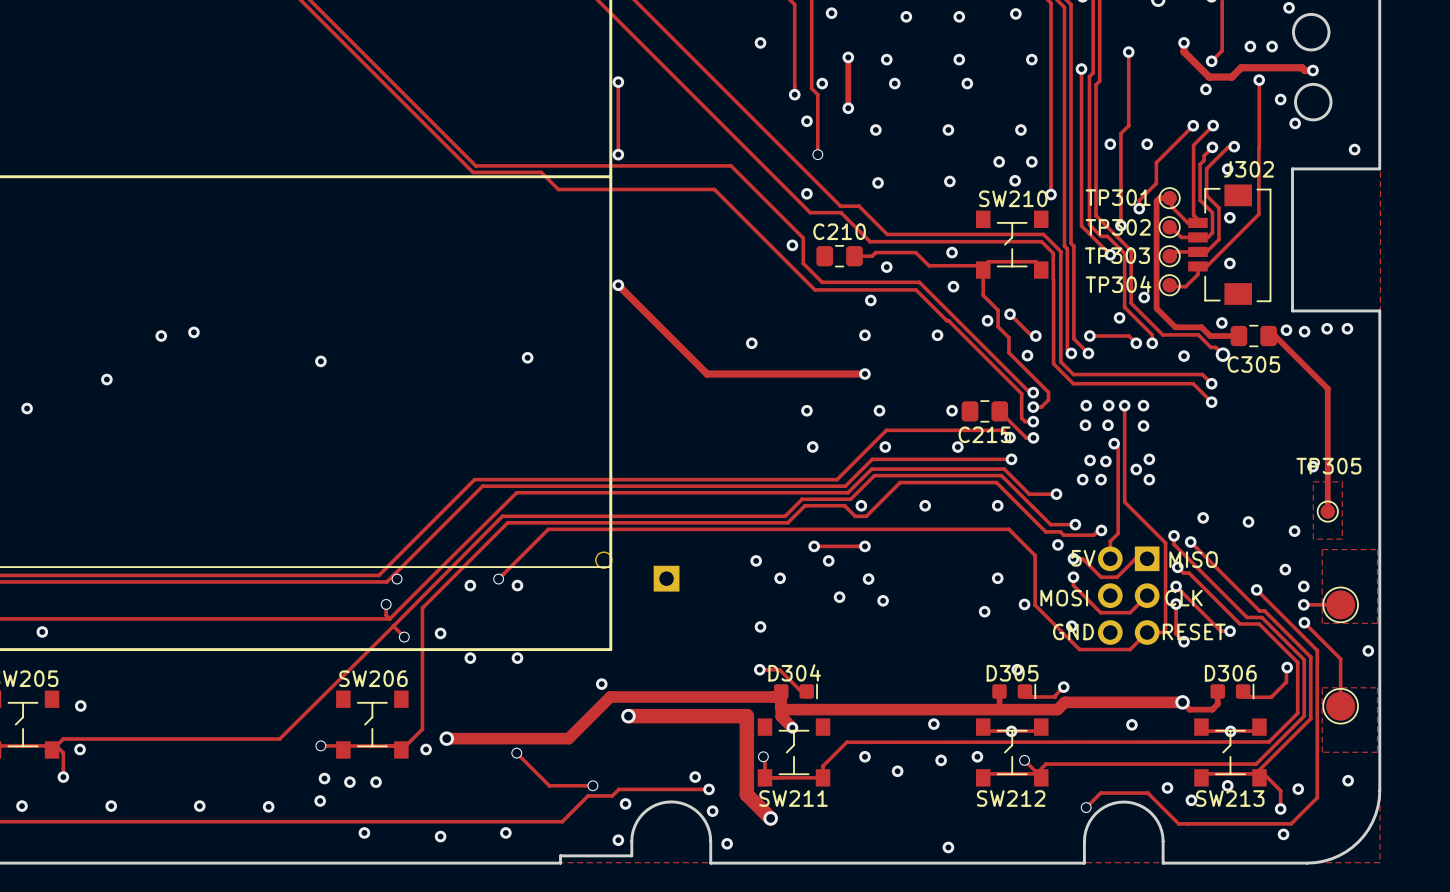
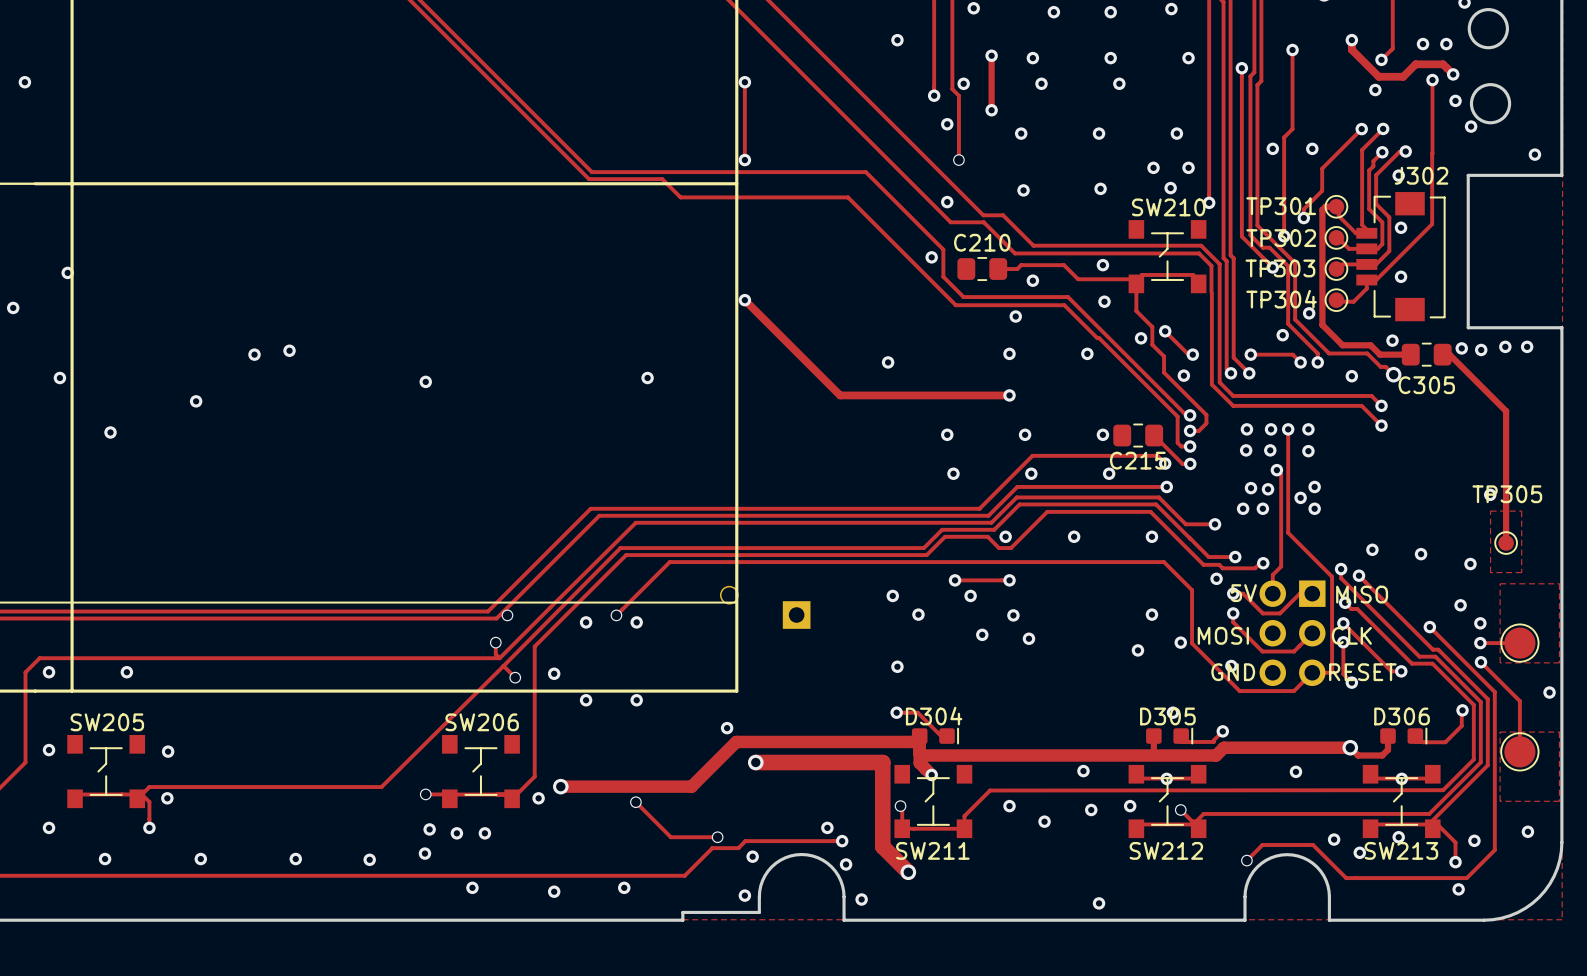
track: (1241, 67) (1302, 67) (1304, 70) (1313, 70) -> (1413, 66) (1415, 64) (1443, 64) (1453, 74)
via position: (1313, 70) -> (1453, 74)

